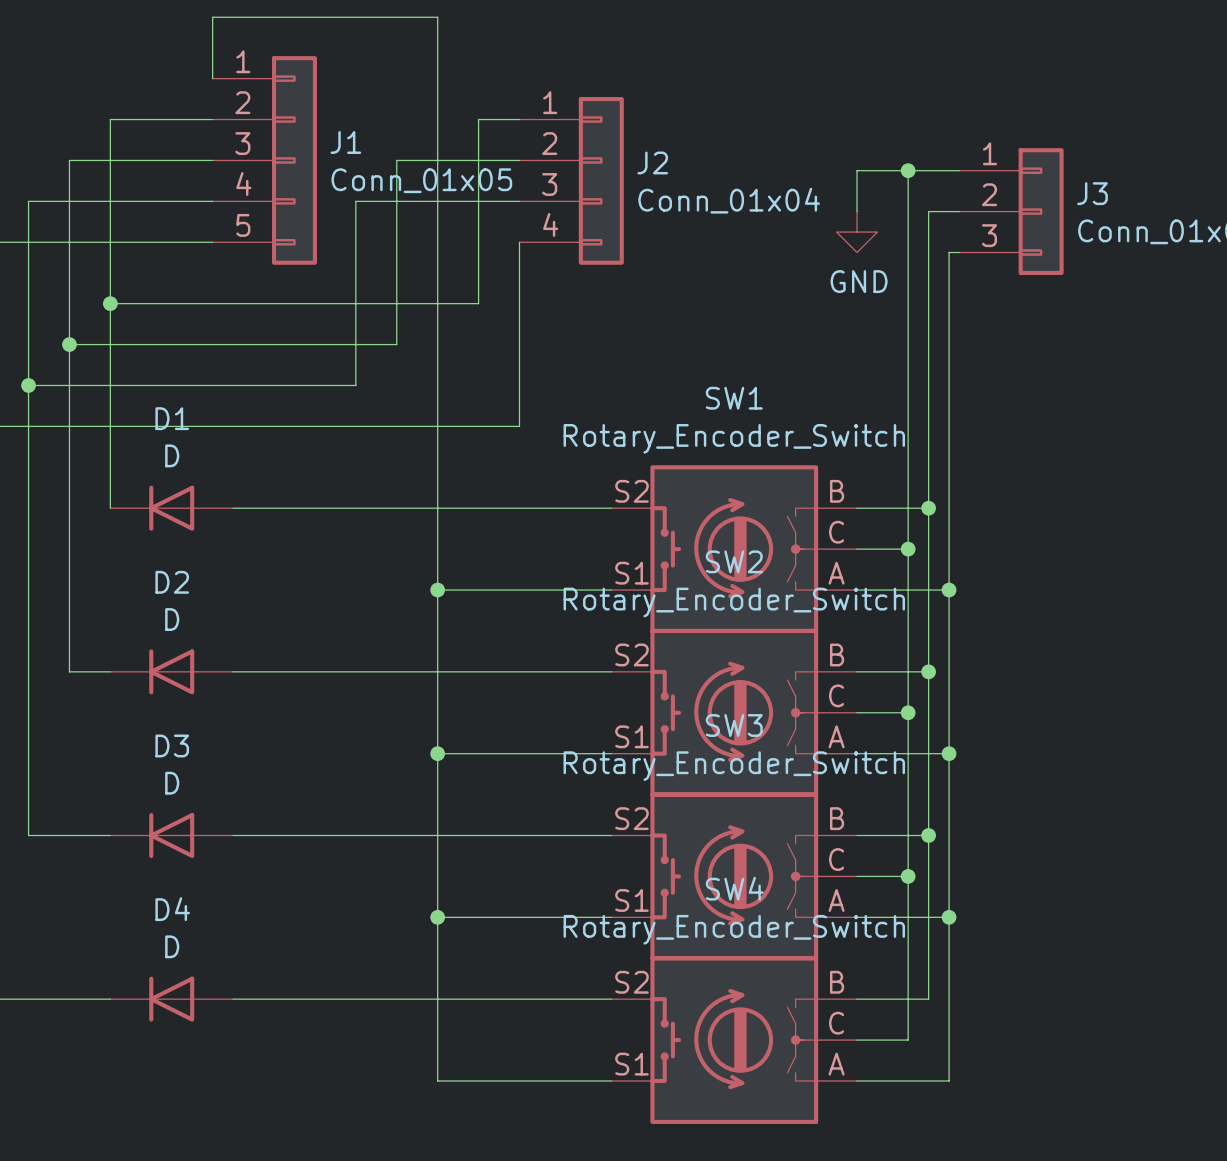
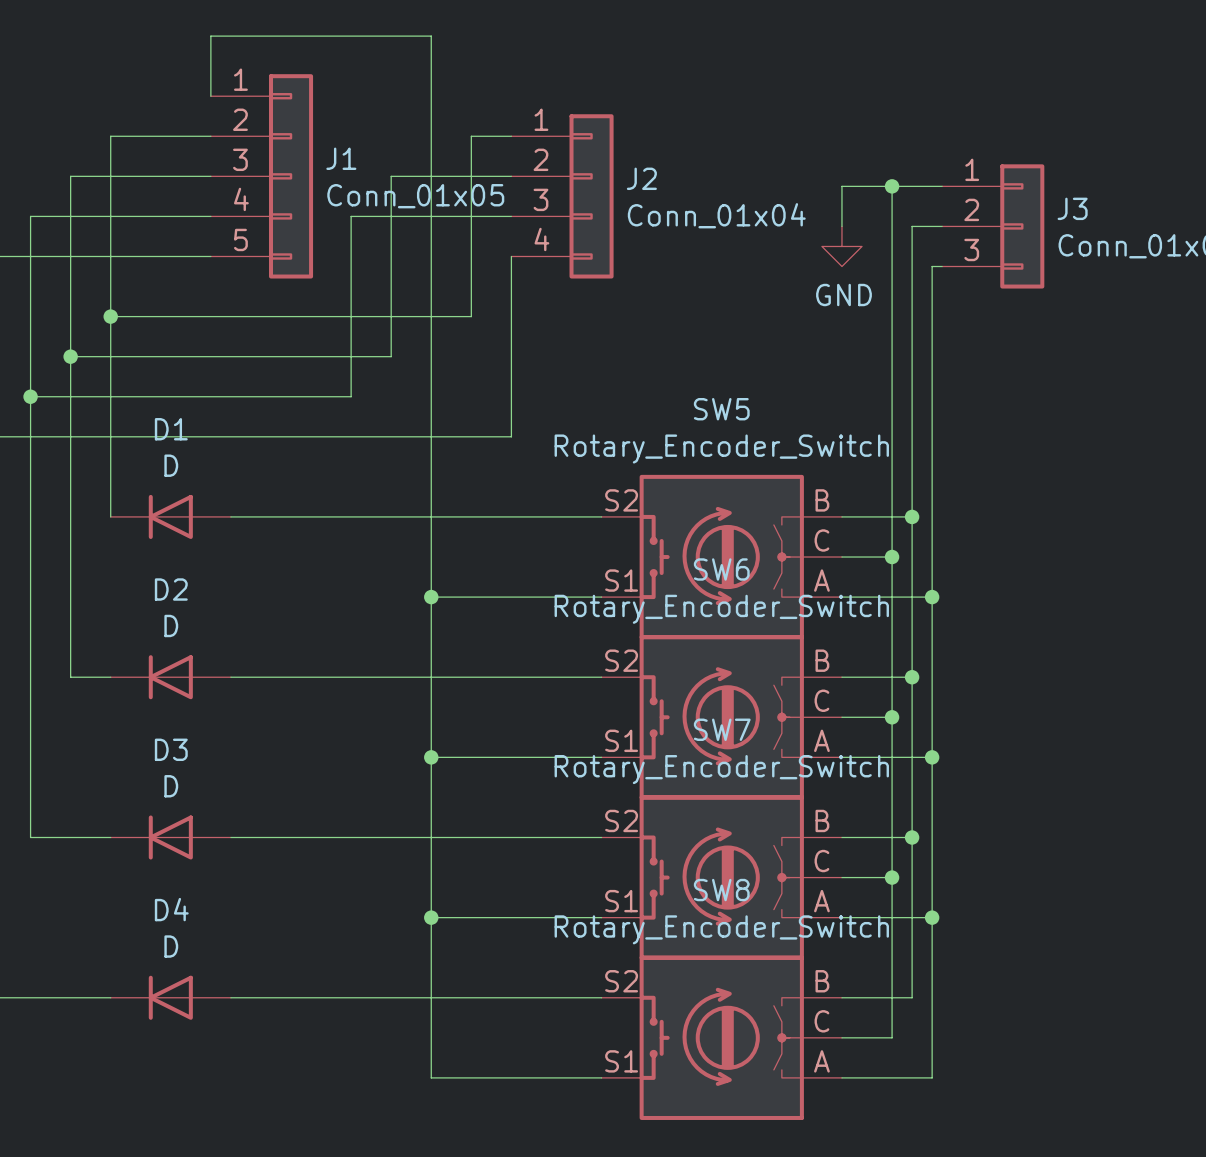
SW1 name: SW1 (734, 398) -> SW5 (721, 409)
SW2 name: SW2 (734, 561) -> SW6 (721, 569)
SW3 name: SW3 (734, 725) -> SW7 (722, 729)
SW4 name: SW4 (734, 888) -> SW8 (721, 890)

